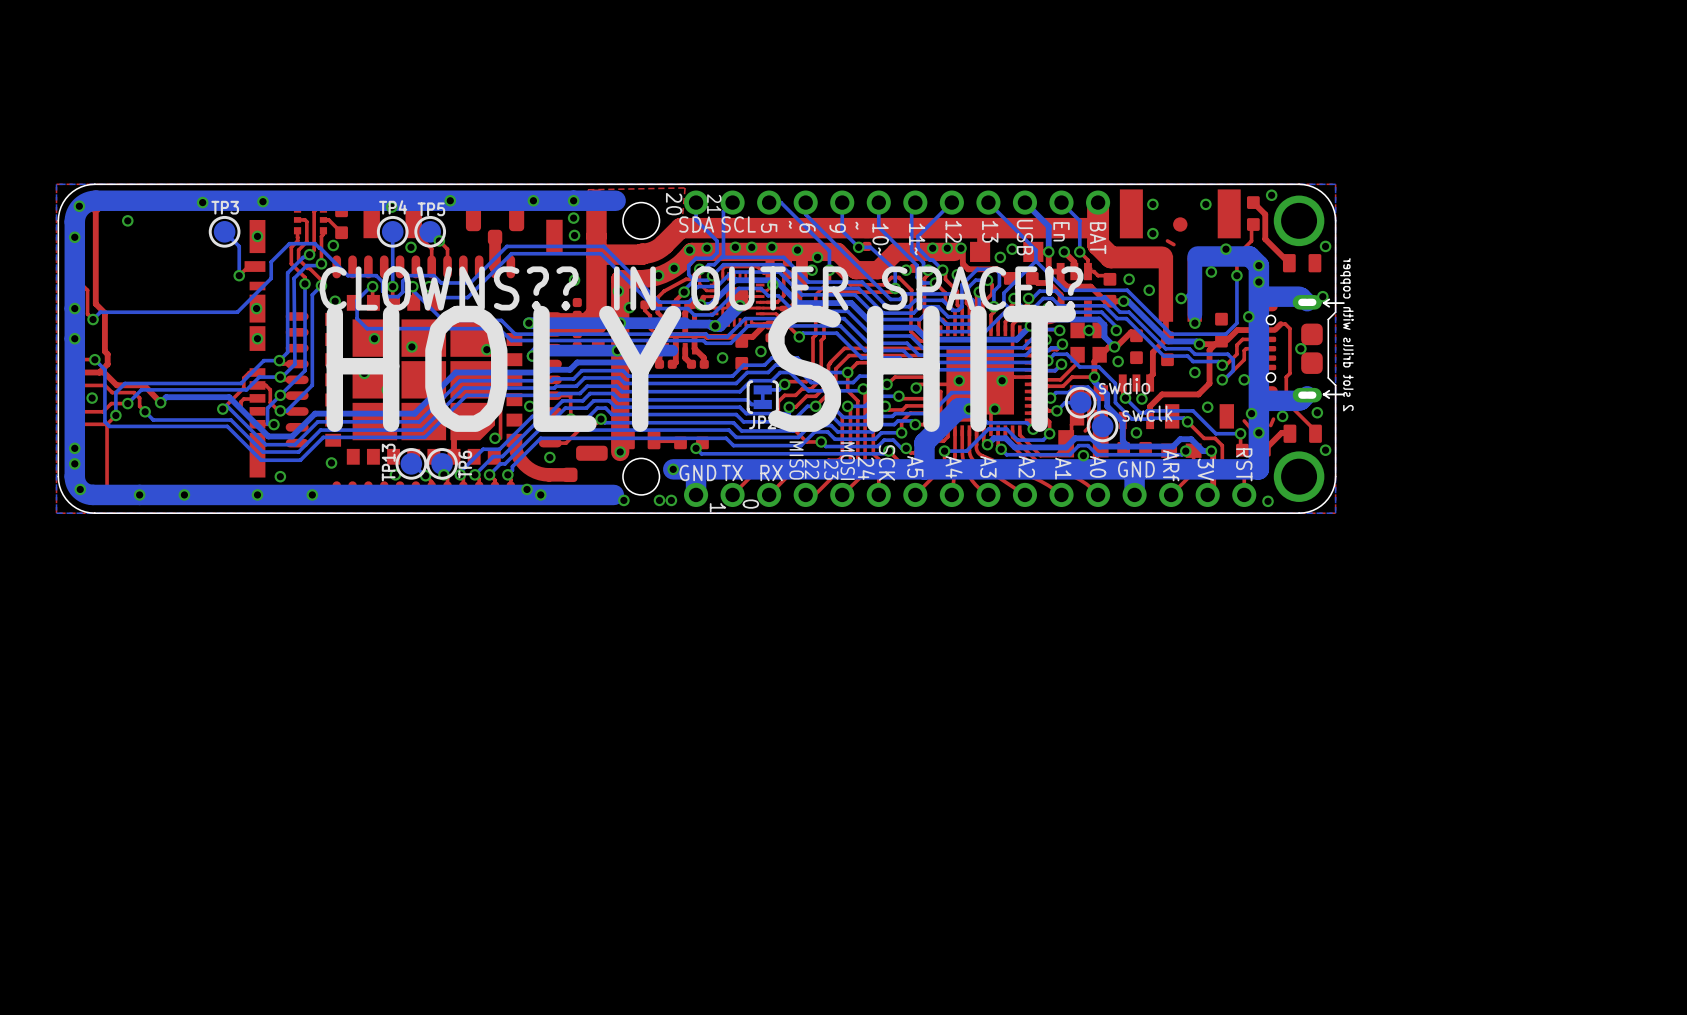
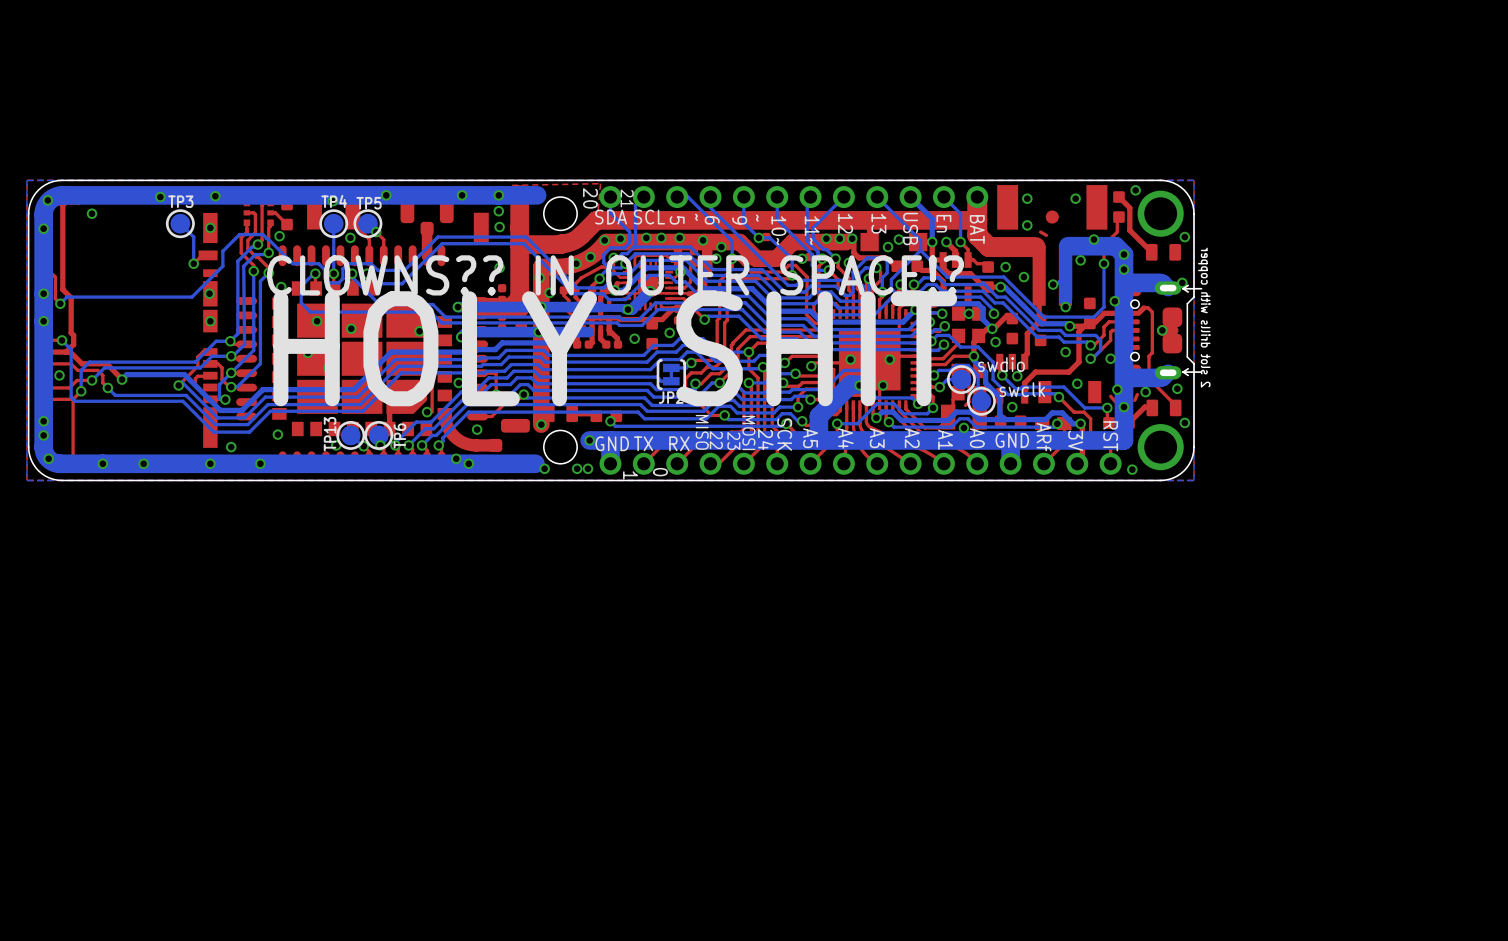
top track: none -> (1173, 330) (1162, 330)

